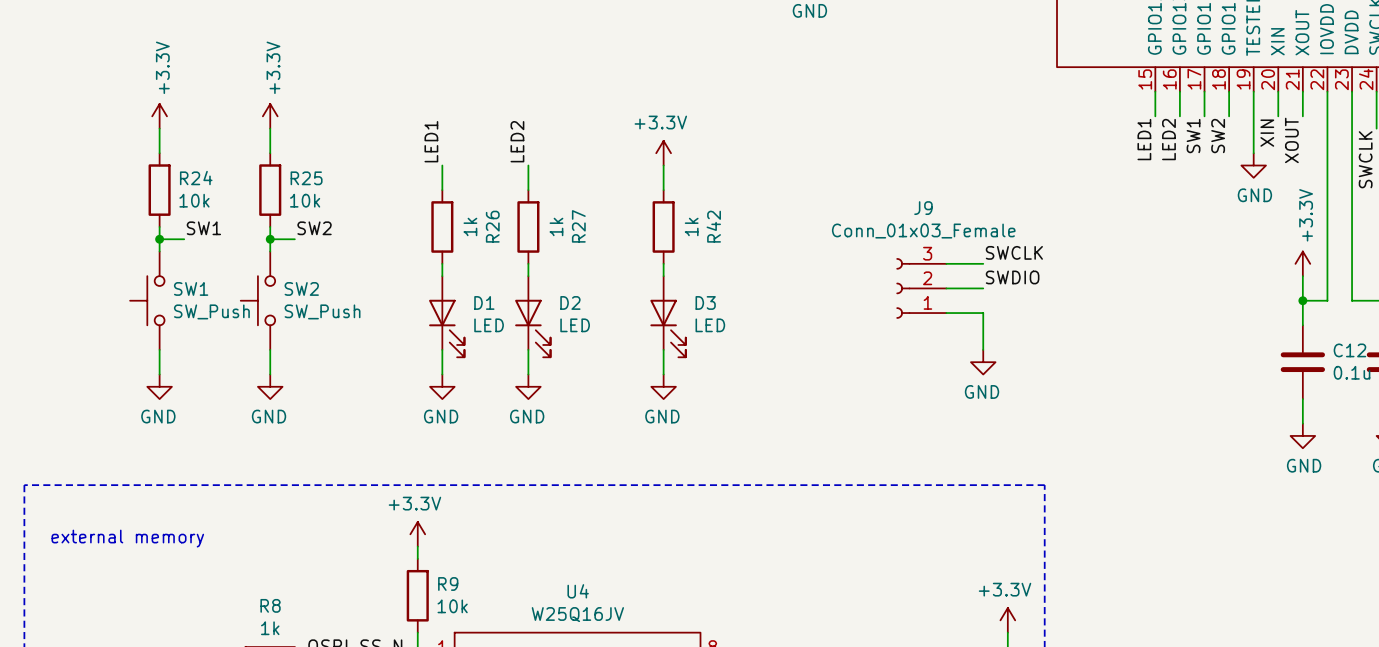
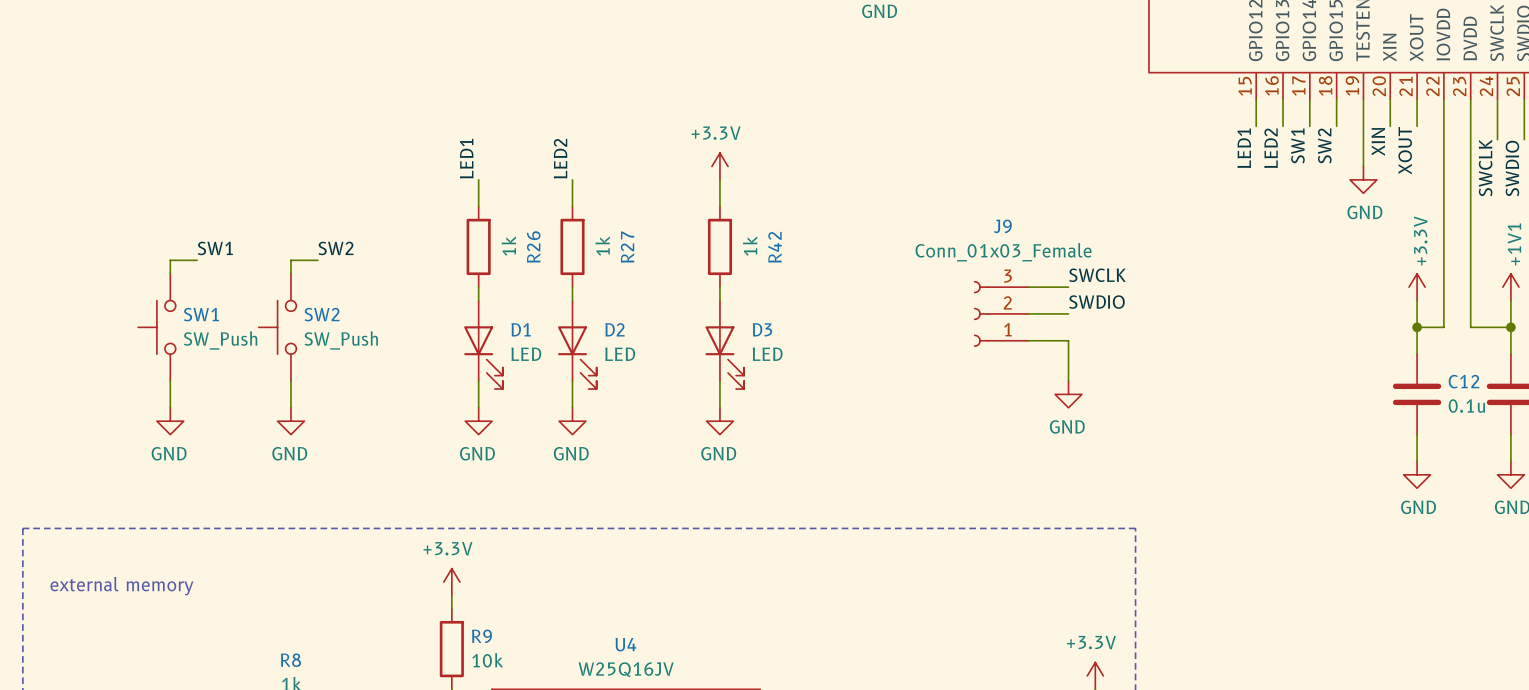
power symbol: +3.3V (159, 116) -> none
power symbol: +3.3V (270, 116) -> none
wire: (159, 128) (159, 153) -> none
wire: (270, 128) (270, 153) -> none
R24: 10k (159, 190) -> none
R25: 10k (270, 190) -> none
wire: (159, 226) (159, 239) -> none
wire: (270, 226) (270, 239) -> none
junction: (159, 239) -> none
junction: (270, 239) -> none

